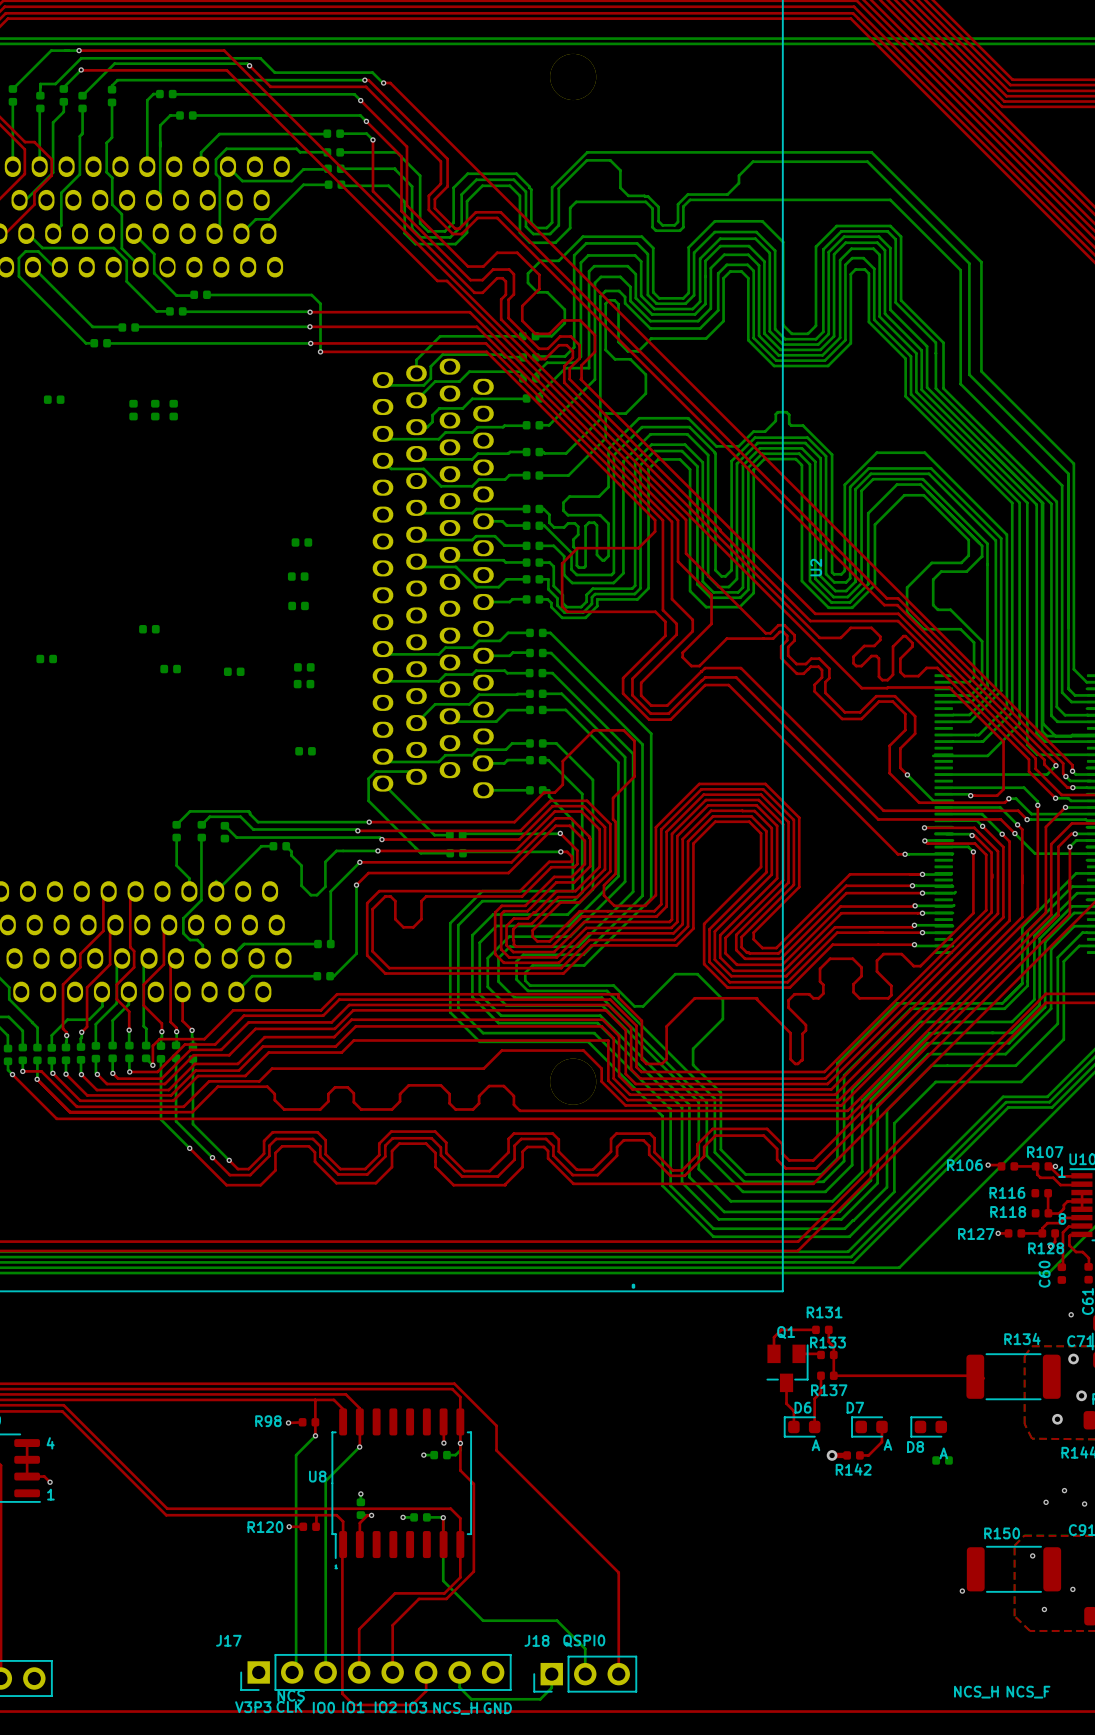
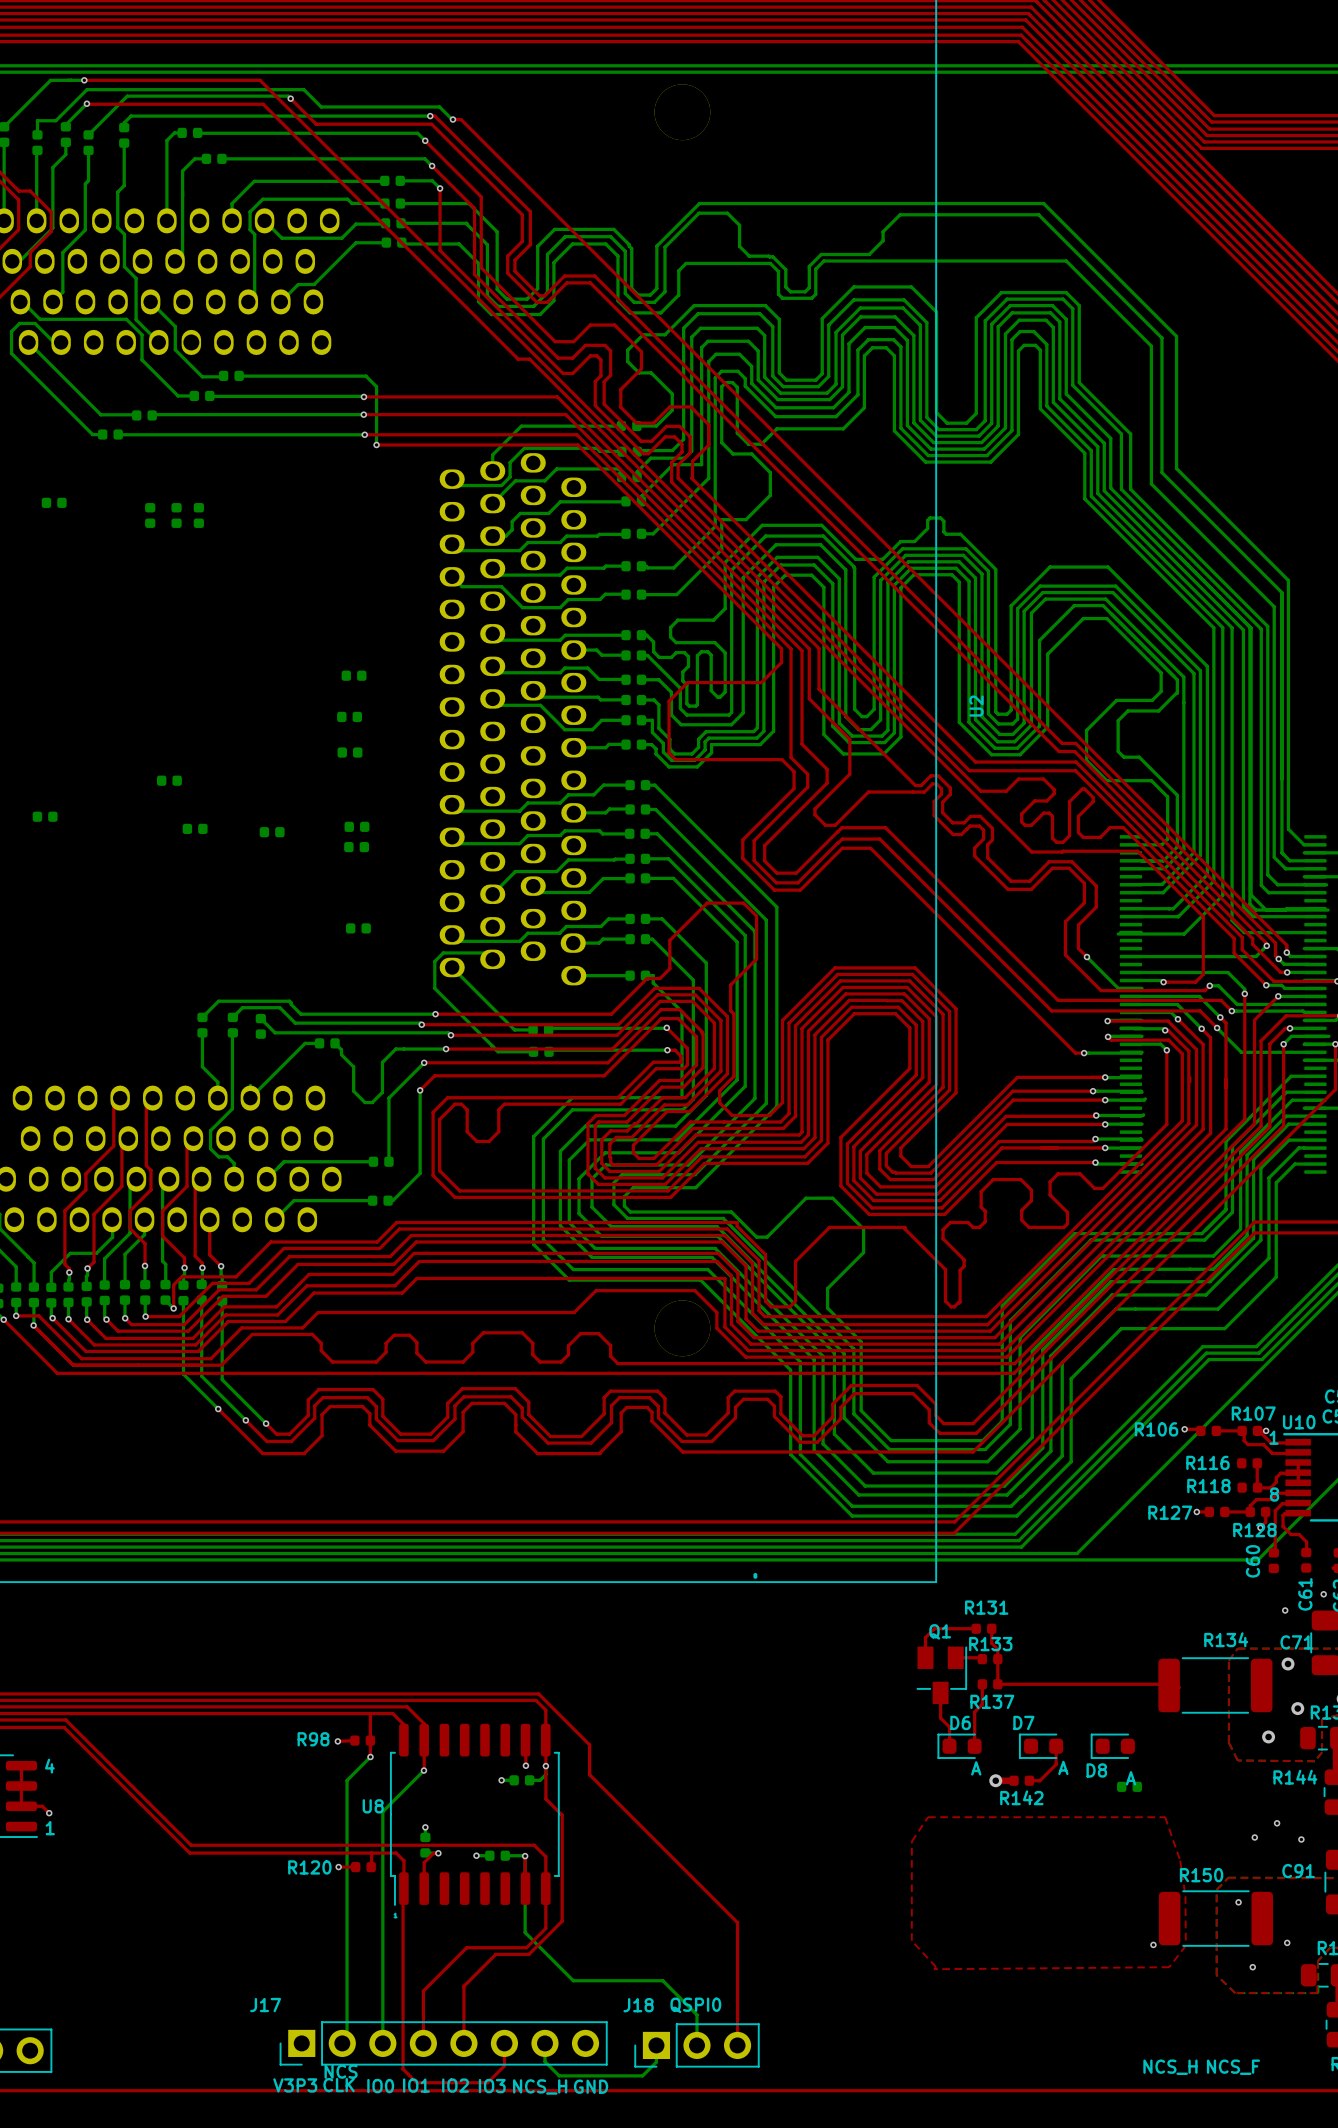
top zone outline: none -> (928, 1817) (911, 1841) (911, 1940) (936, 1967) (934, 1969) (1169, 1967) (1185, 1945) (1185, 1896) (1180, 1860) (1165, 1817) (928, 1817)

